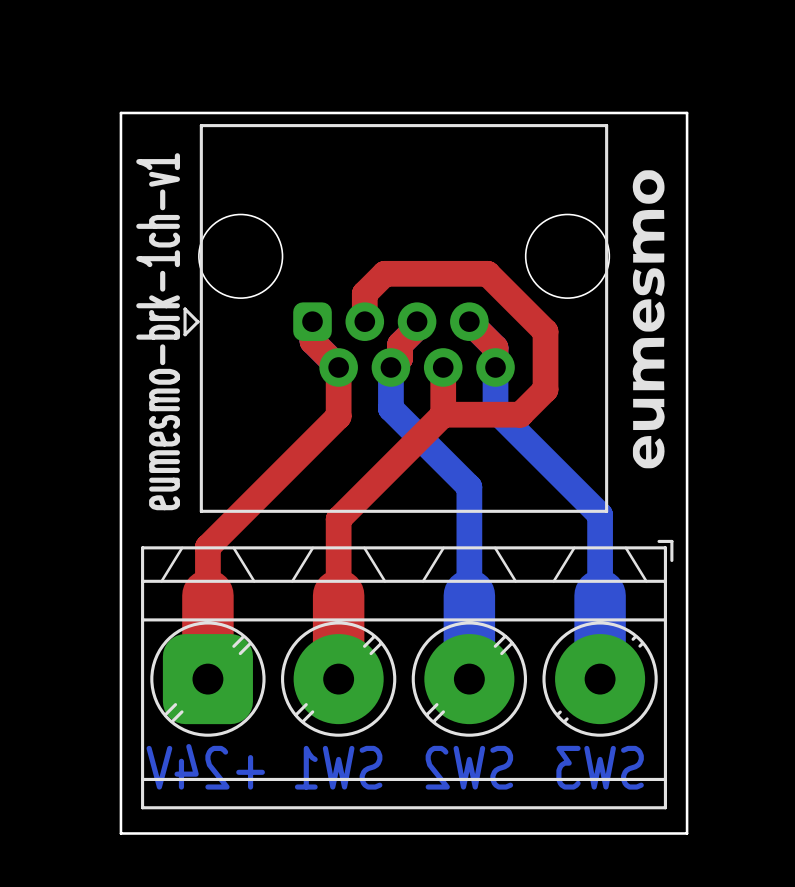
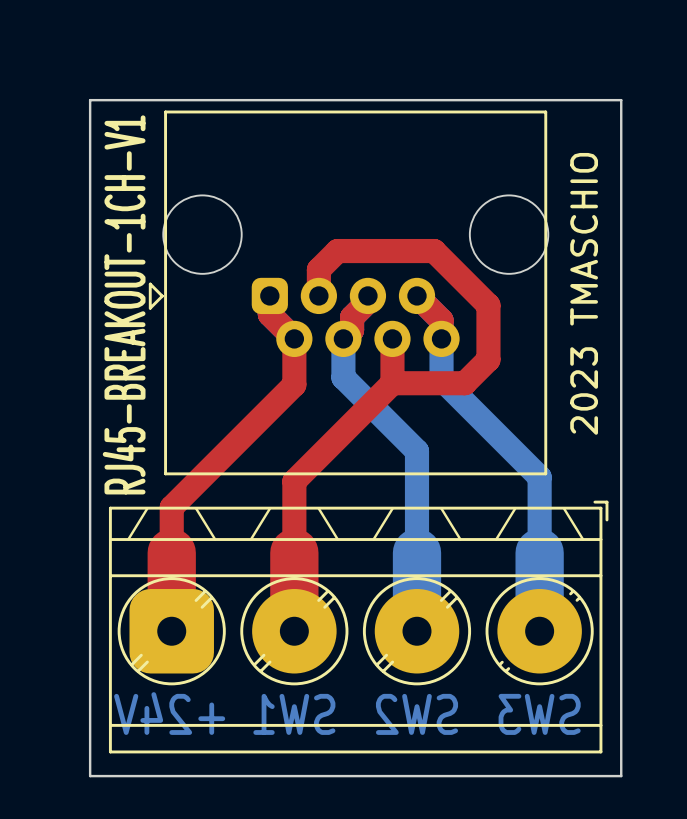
drawing: [632, 170, 665, 469] -> none
text: none -> 2023 TMASCHIO (584, 293)
text: eumesmo-brk-1ch-v1 (158, 331) -> RJ45-BREAKOUT-1CH-V1 (124, 304)

